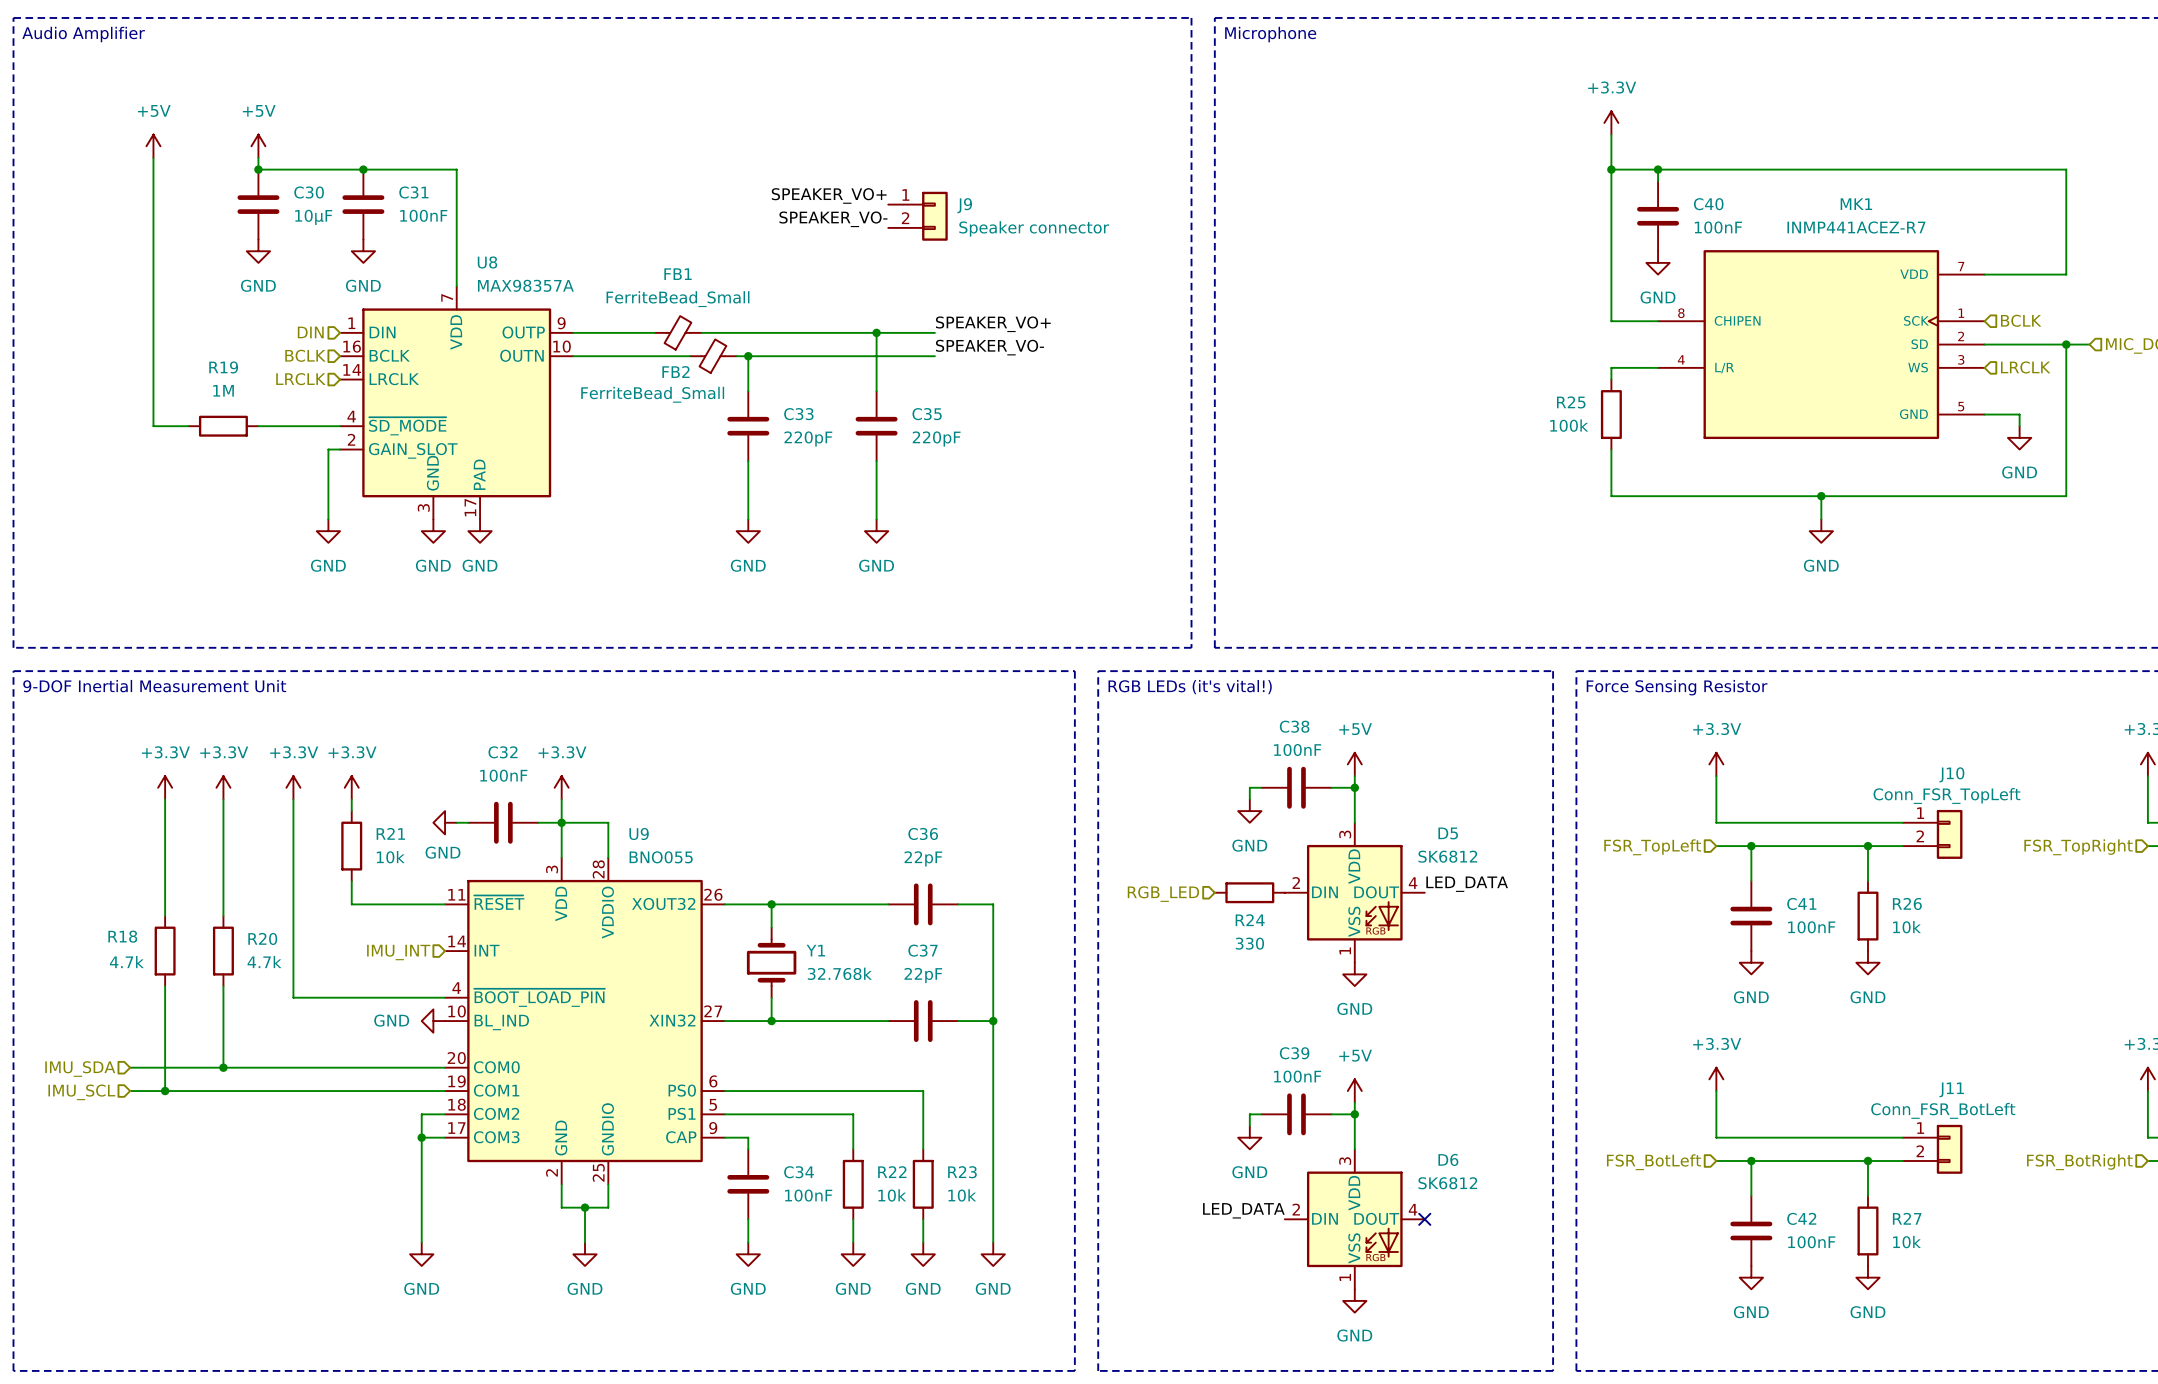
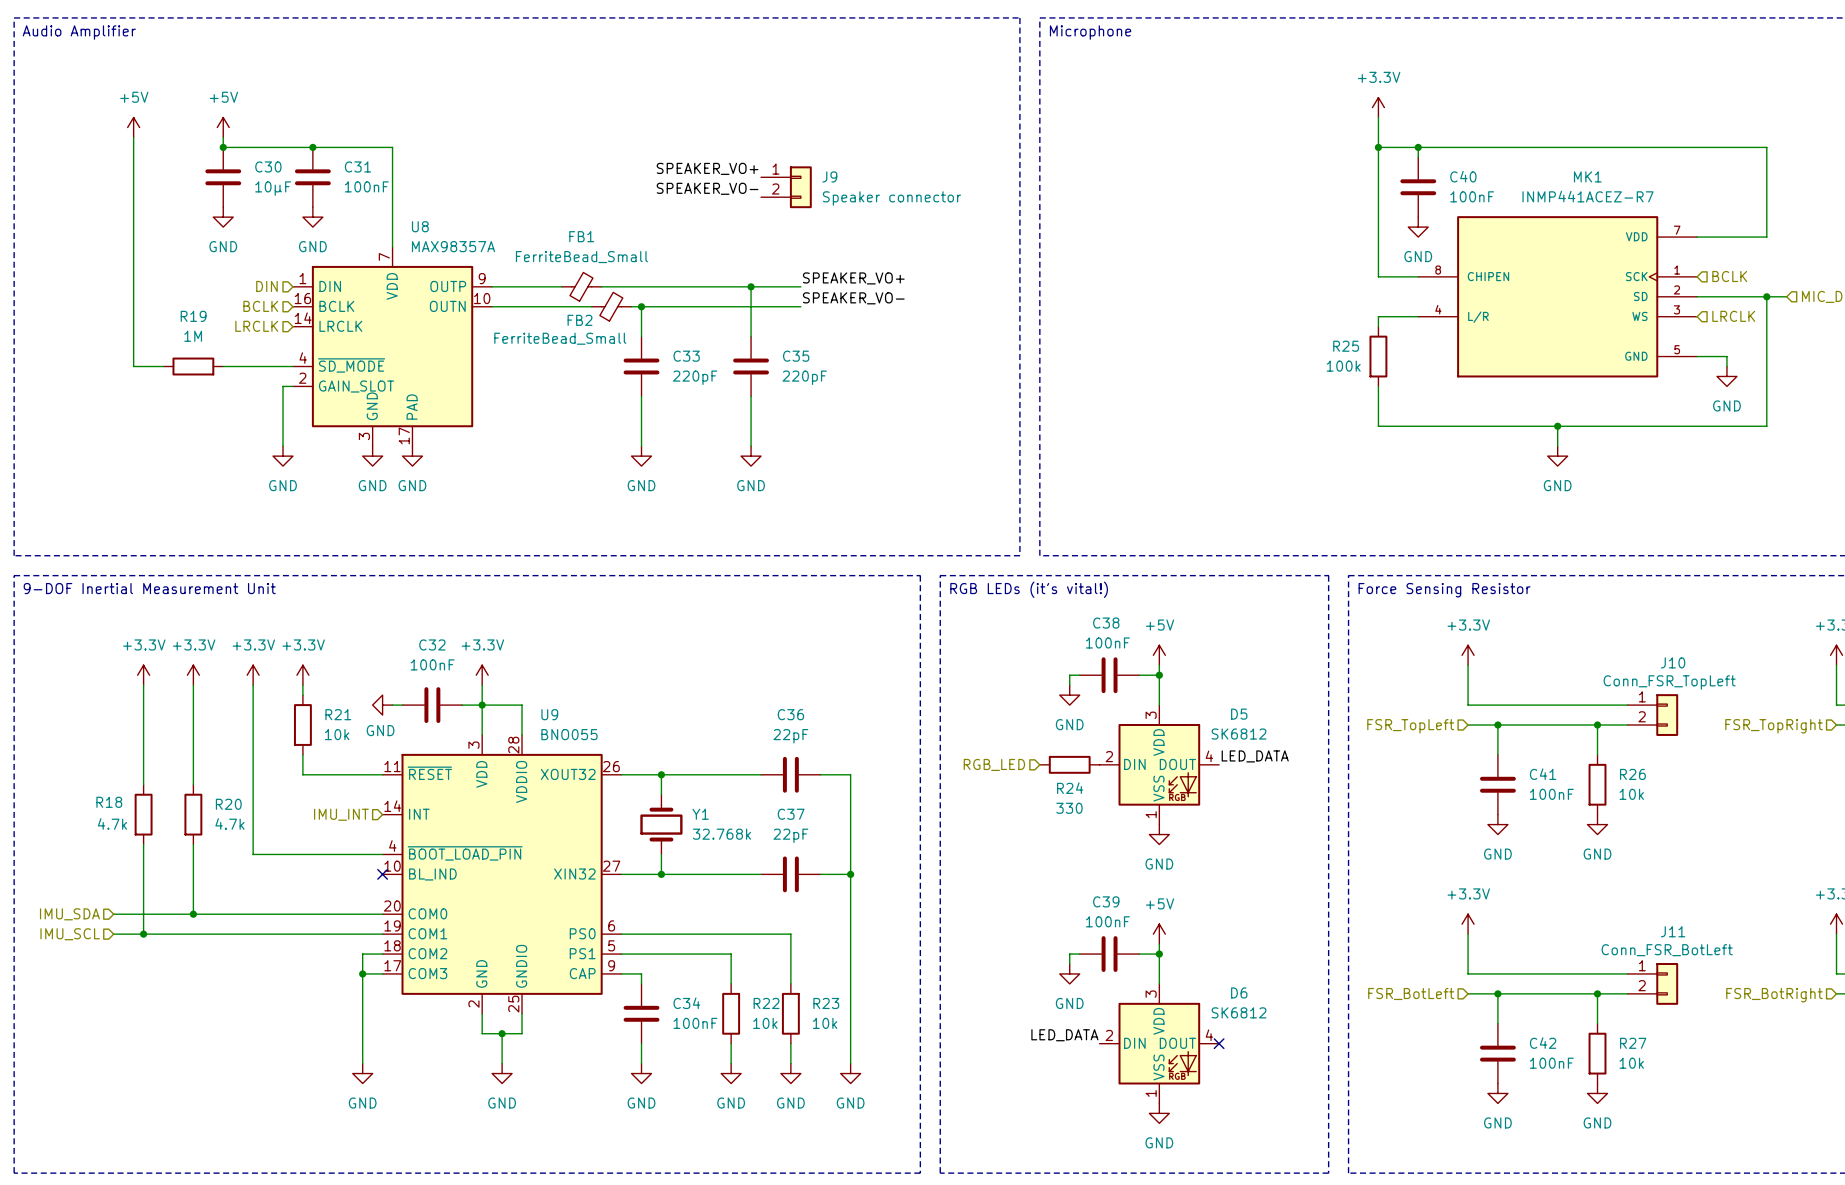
power symbol: GND (433, 1021) -> none
no-connect mark: none -> (382, 874)

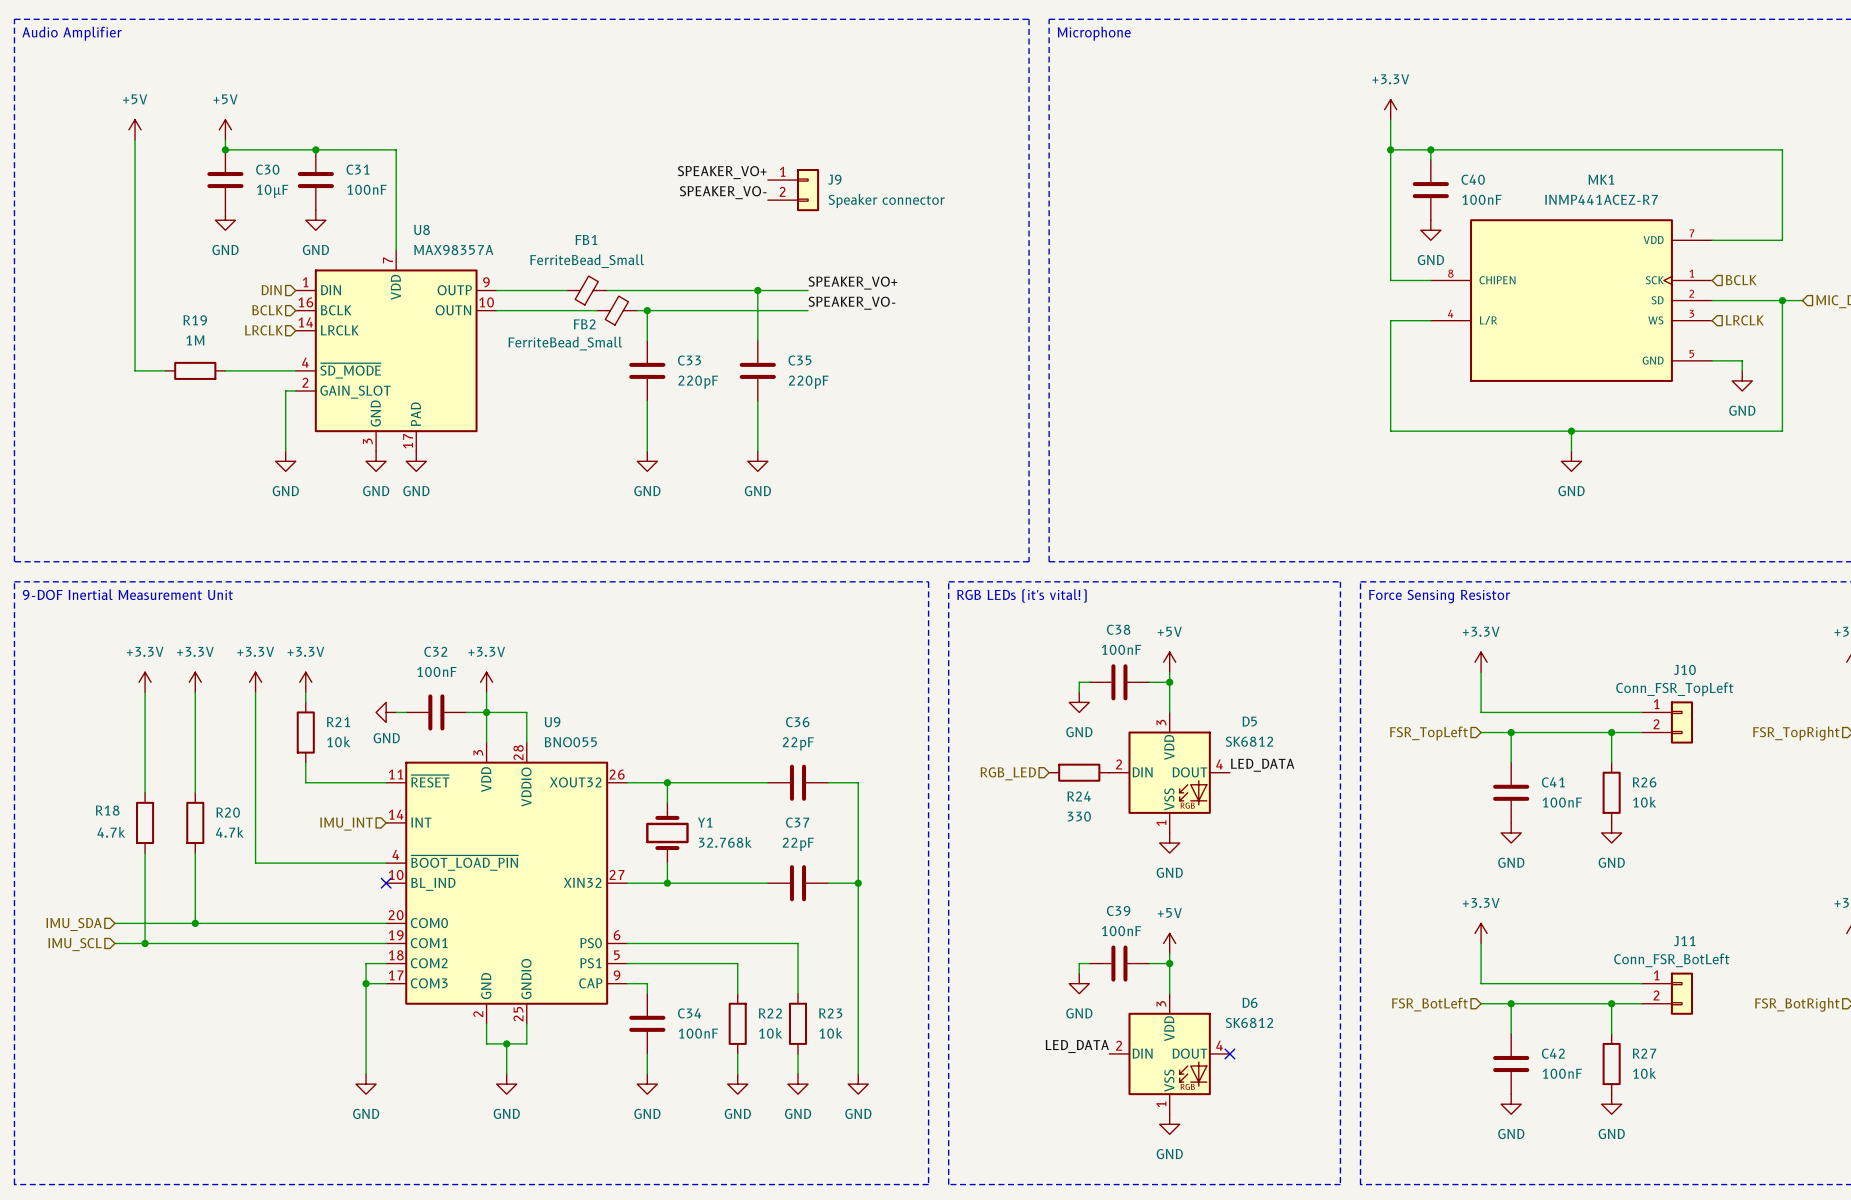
wire: none -> (1390, 330) (1390, 390)
R25: 100k (1378, 356) -> none

